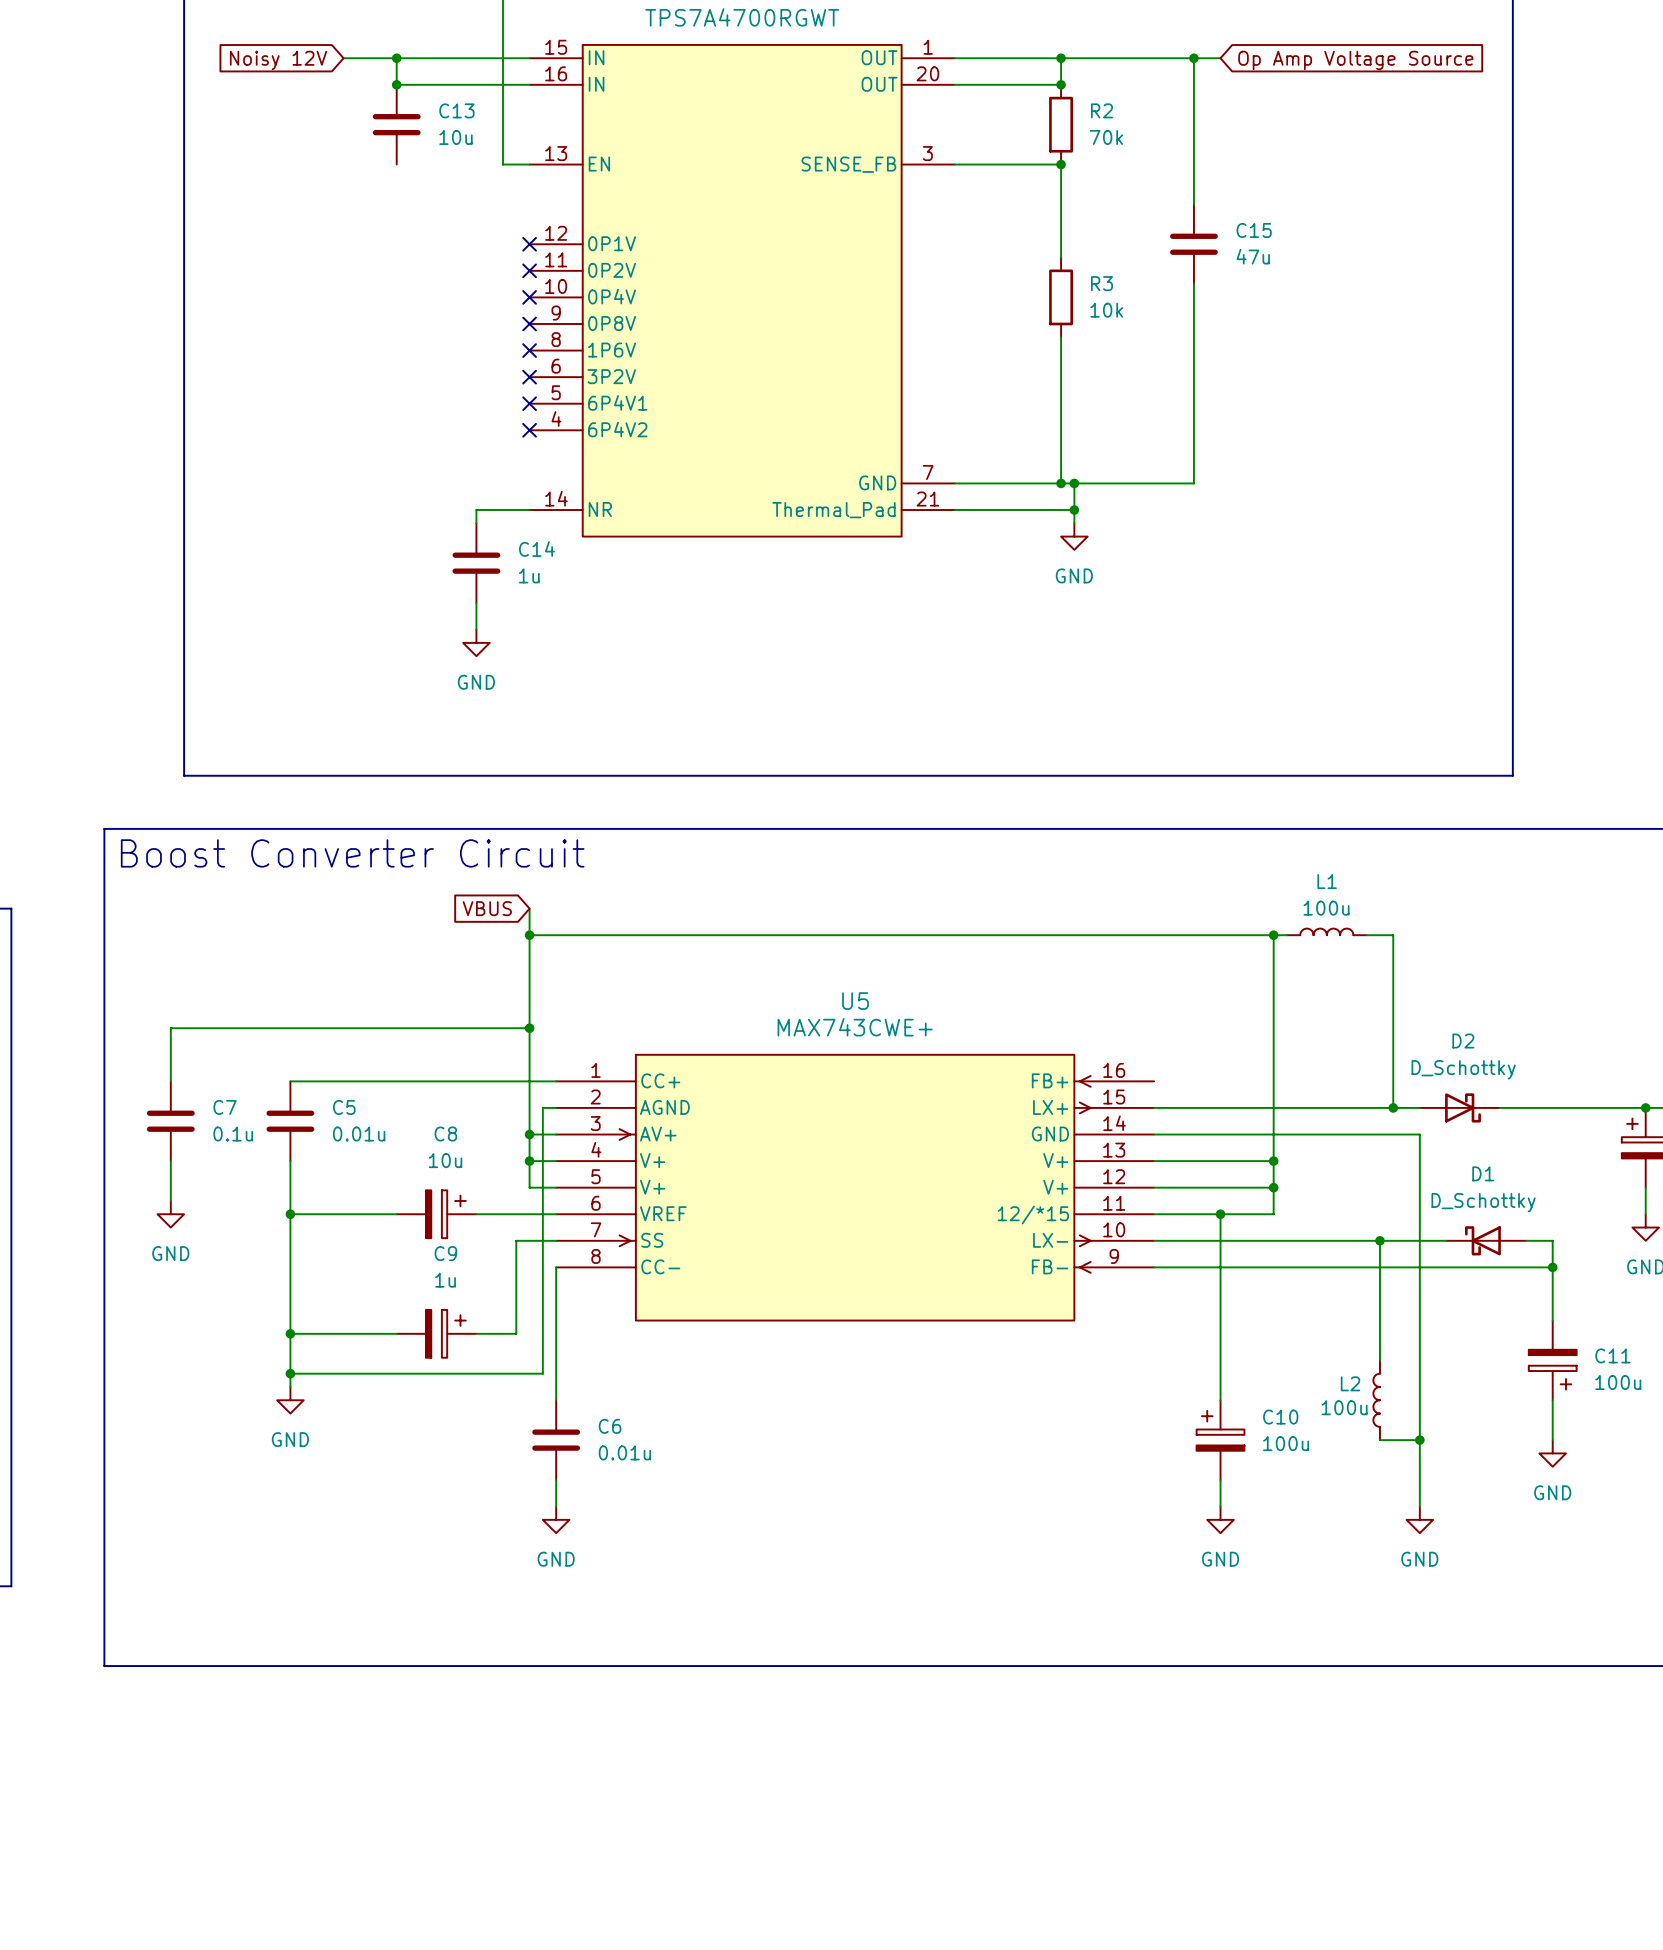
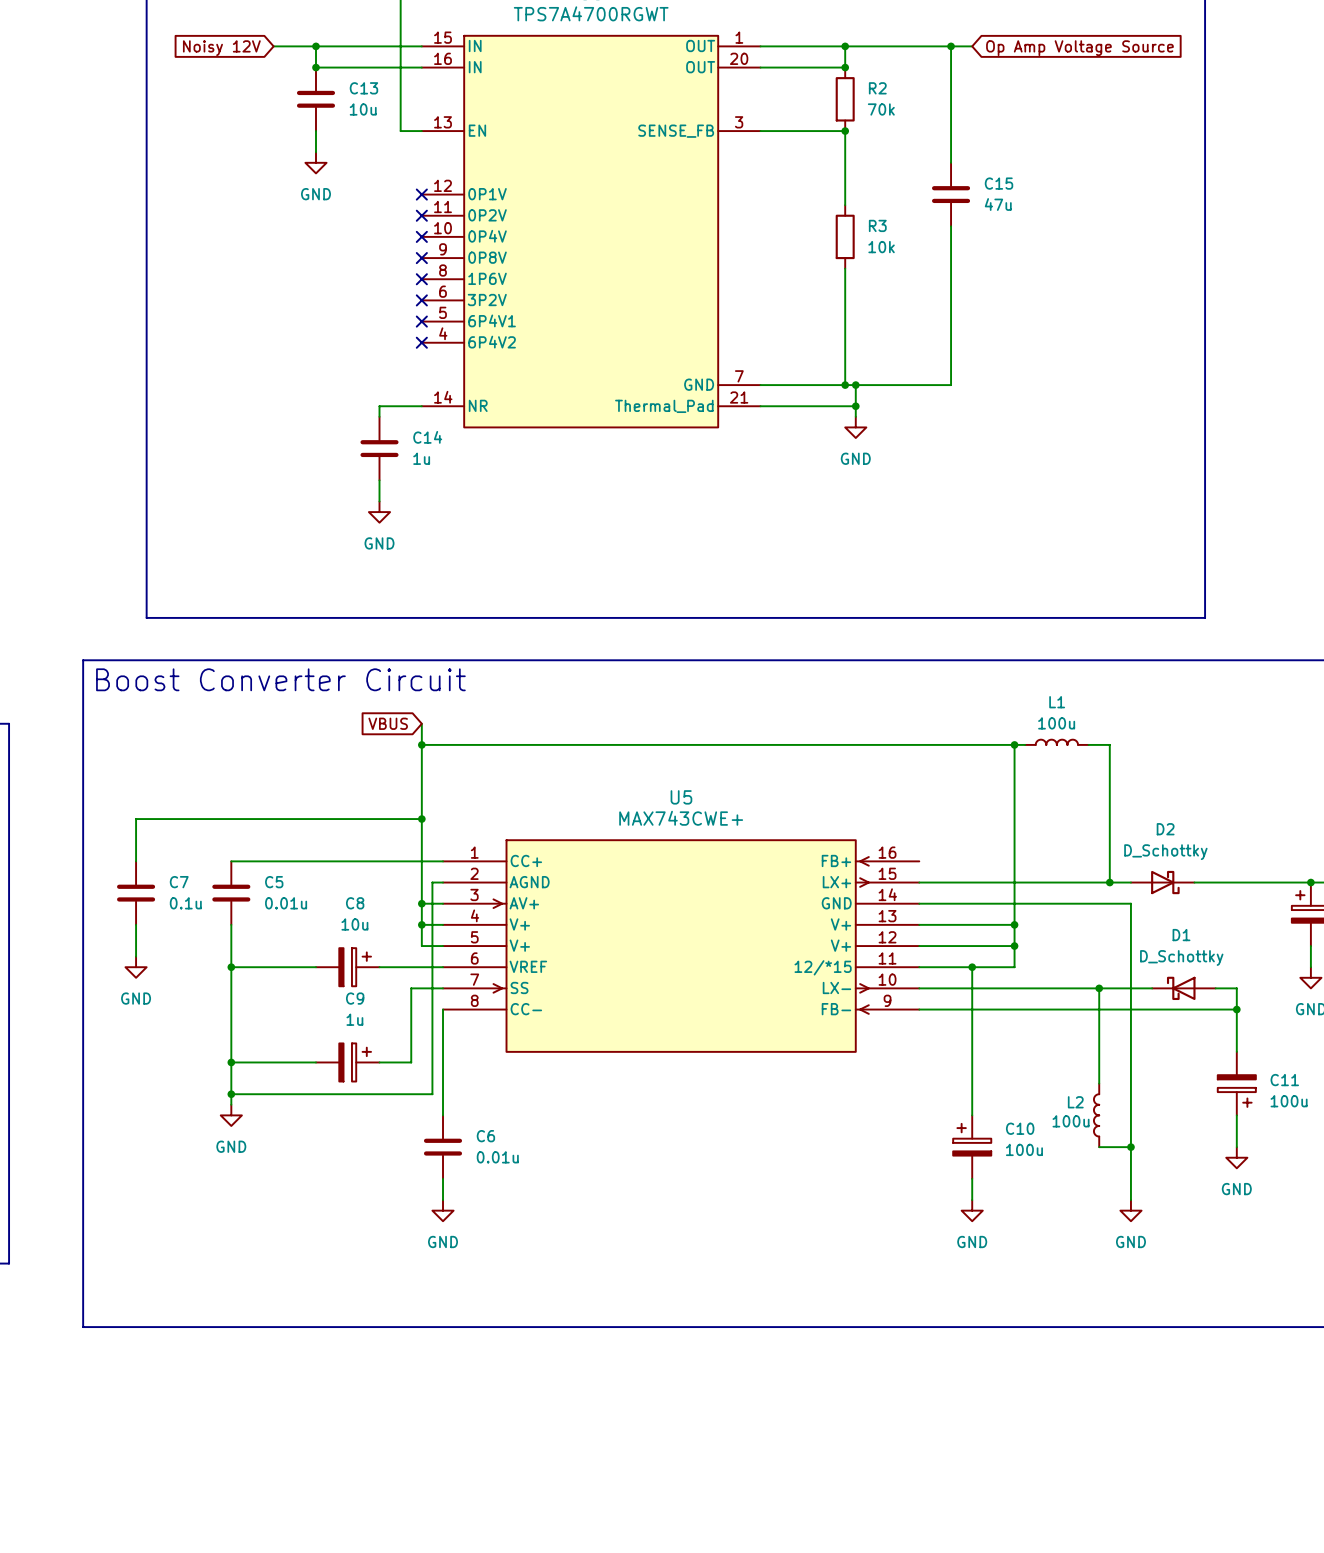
wire: none -> (315, 131) (315, 152)
power symbol: none -> GND (315, 162)

